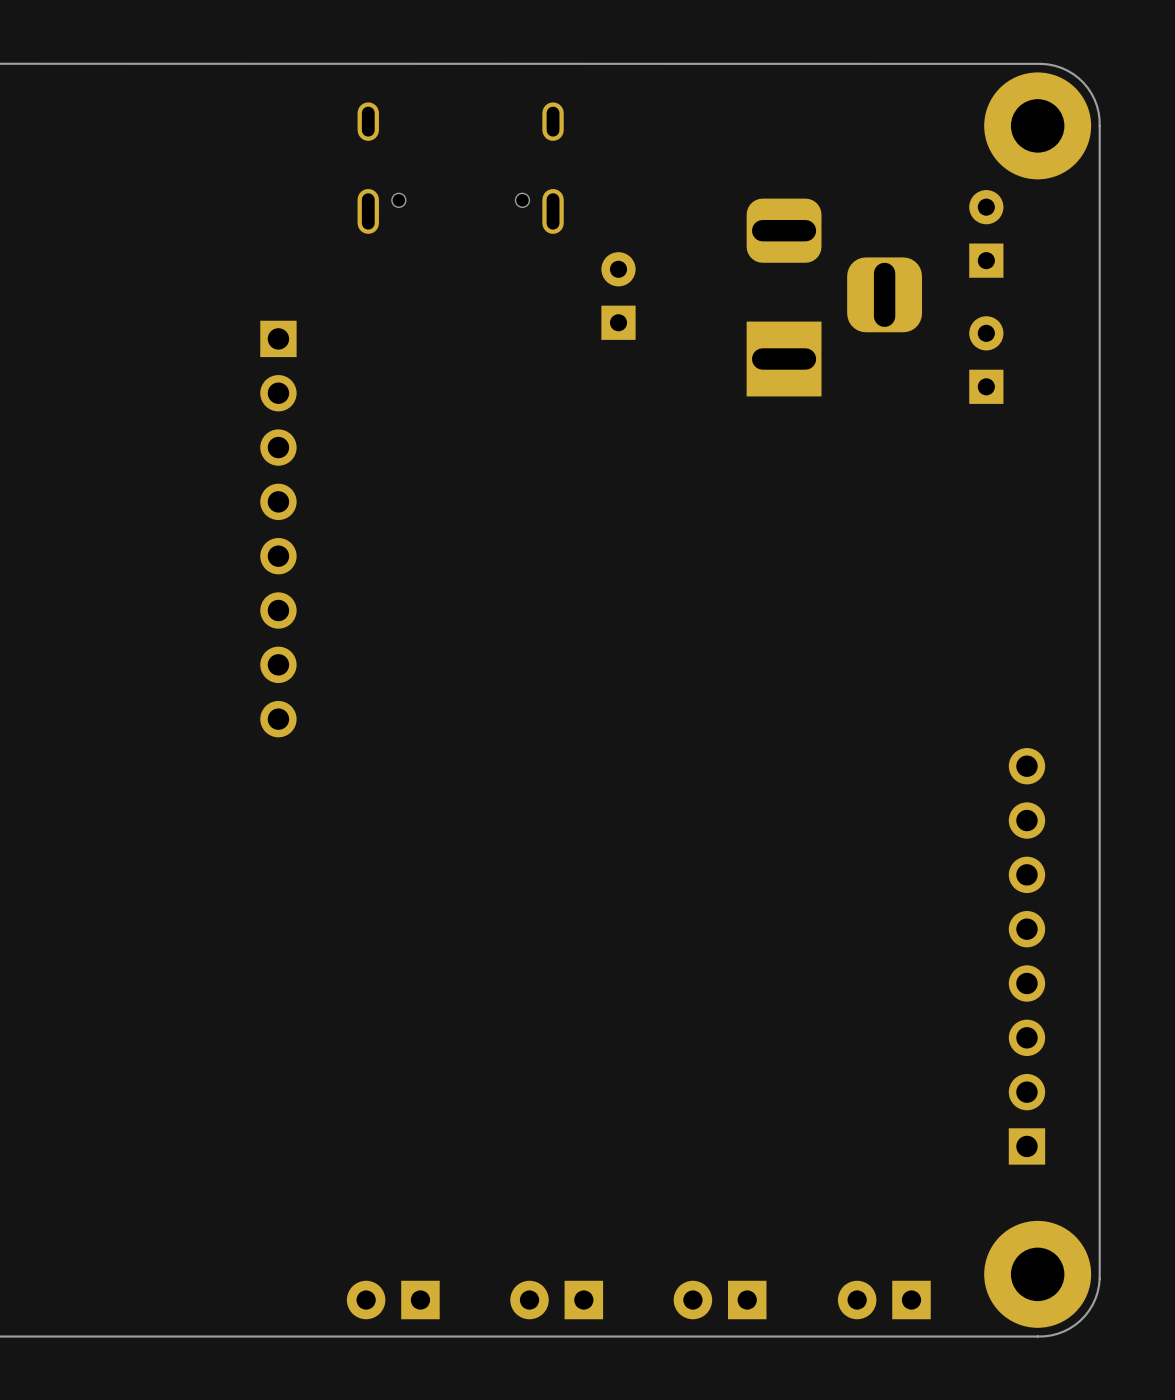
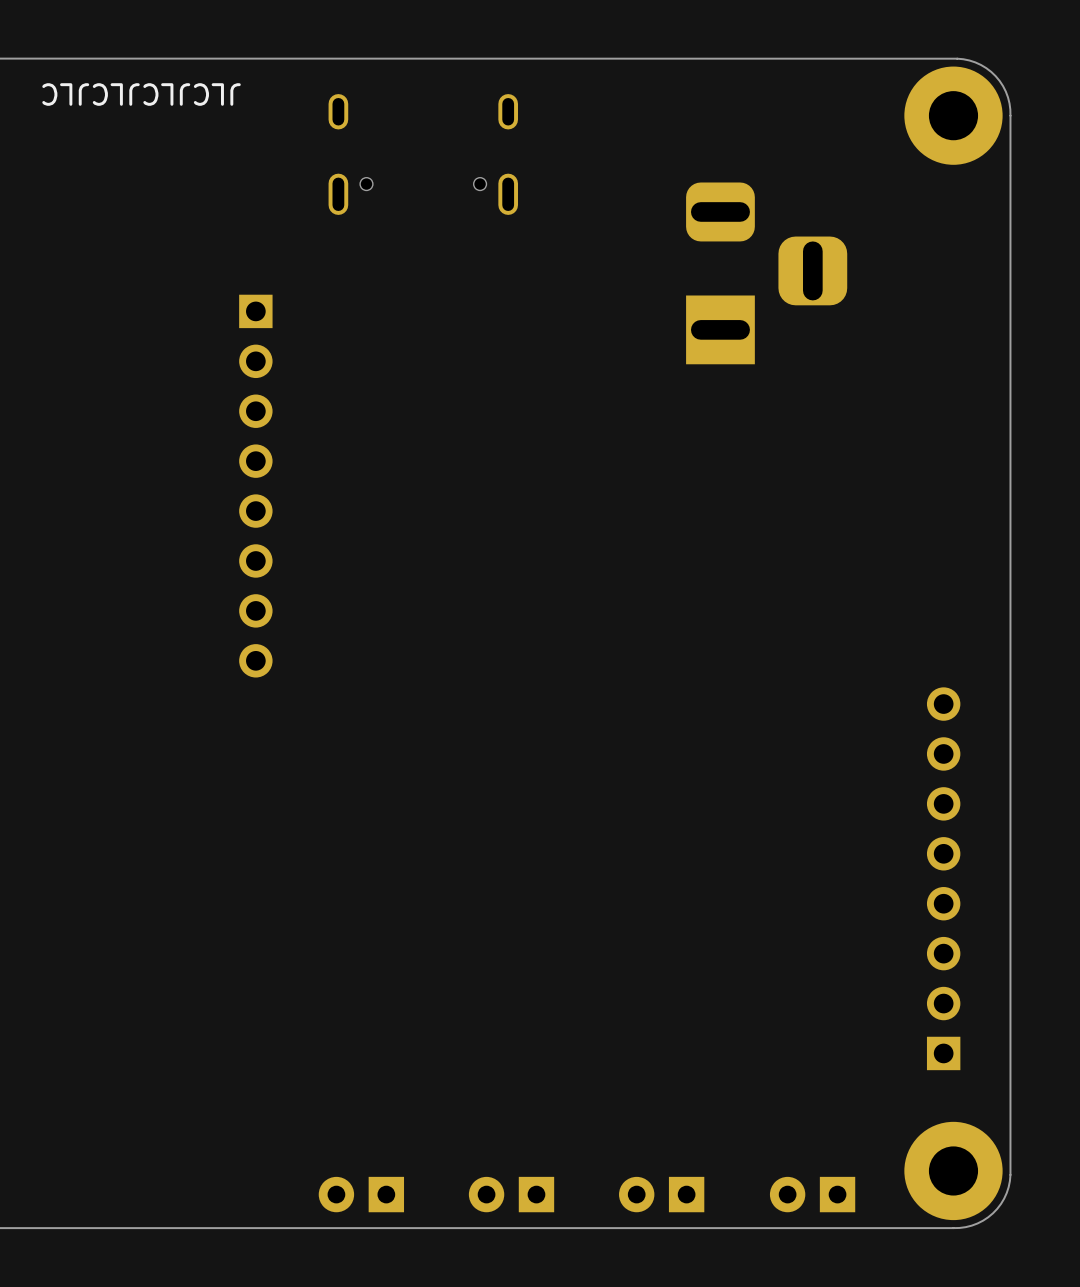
text: none -> JLCJLCJLCJLC (141, 94)
part: (986, 233) -> none
part: (618, 296) -> none
part: (986, 360) -> none

